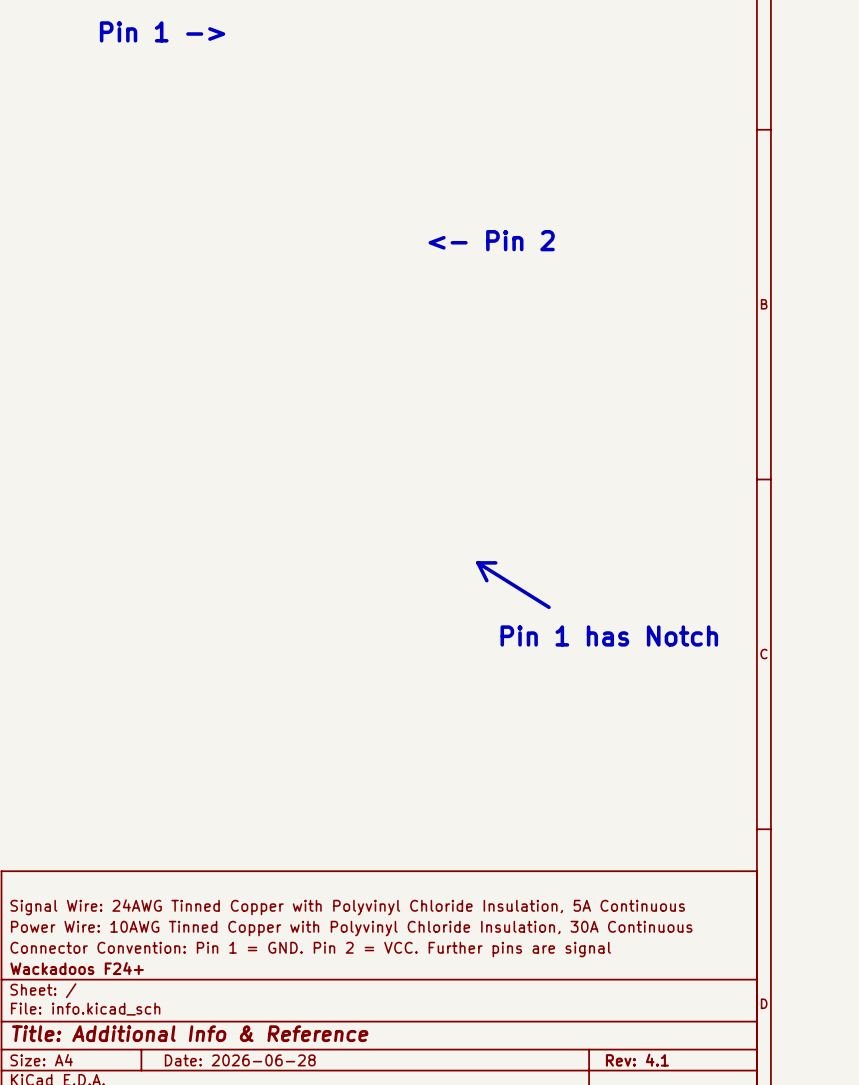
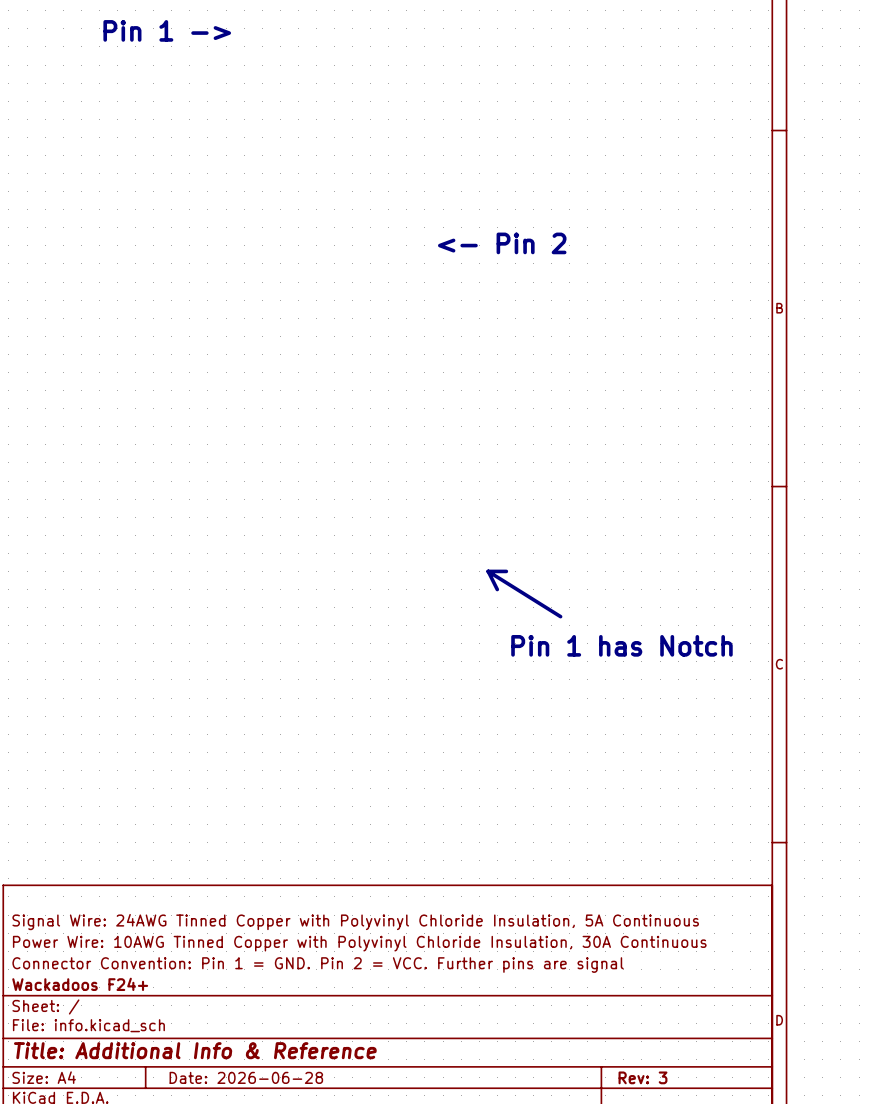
title block: Rev: 4.1 (637, 1060) -> Rev: 3 (642, 1077)

